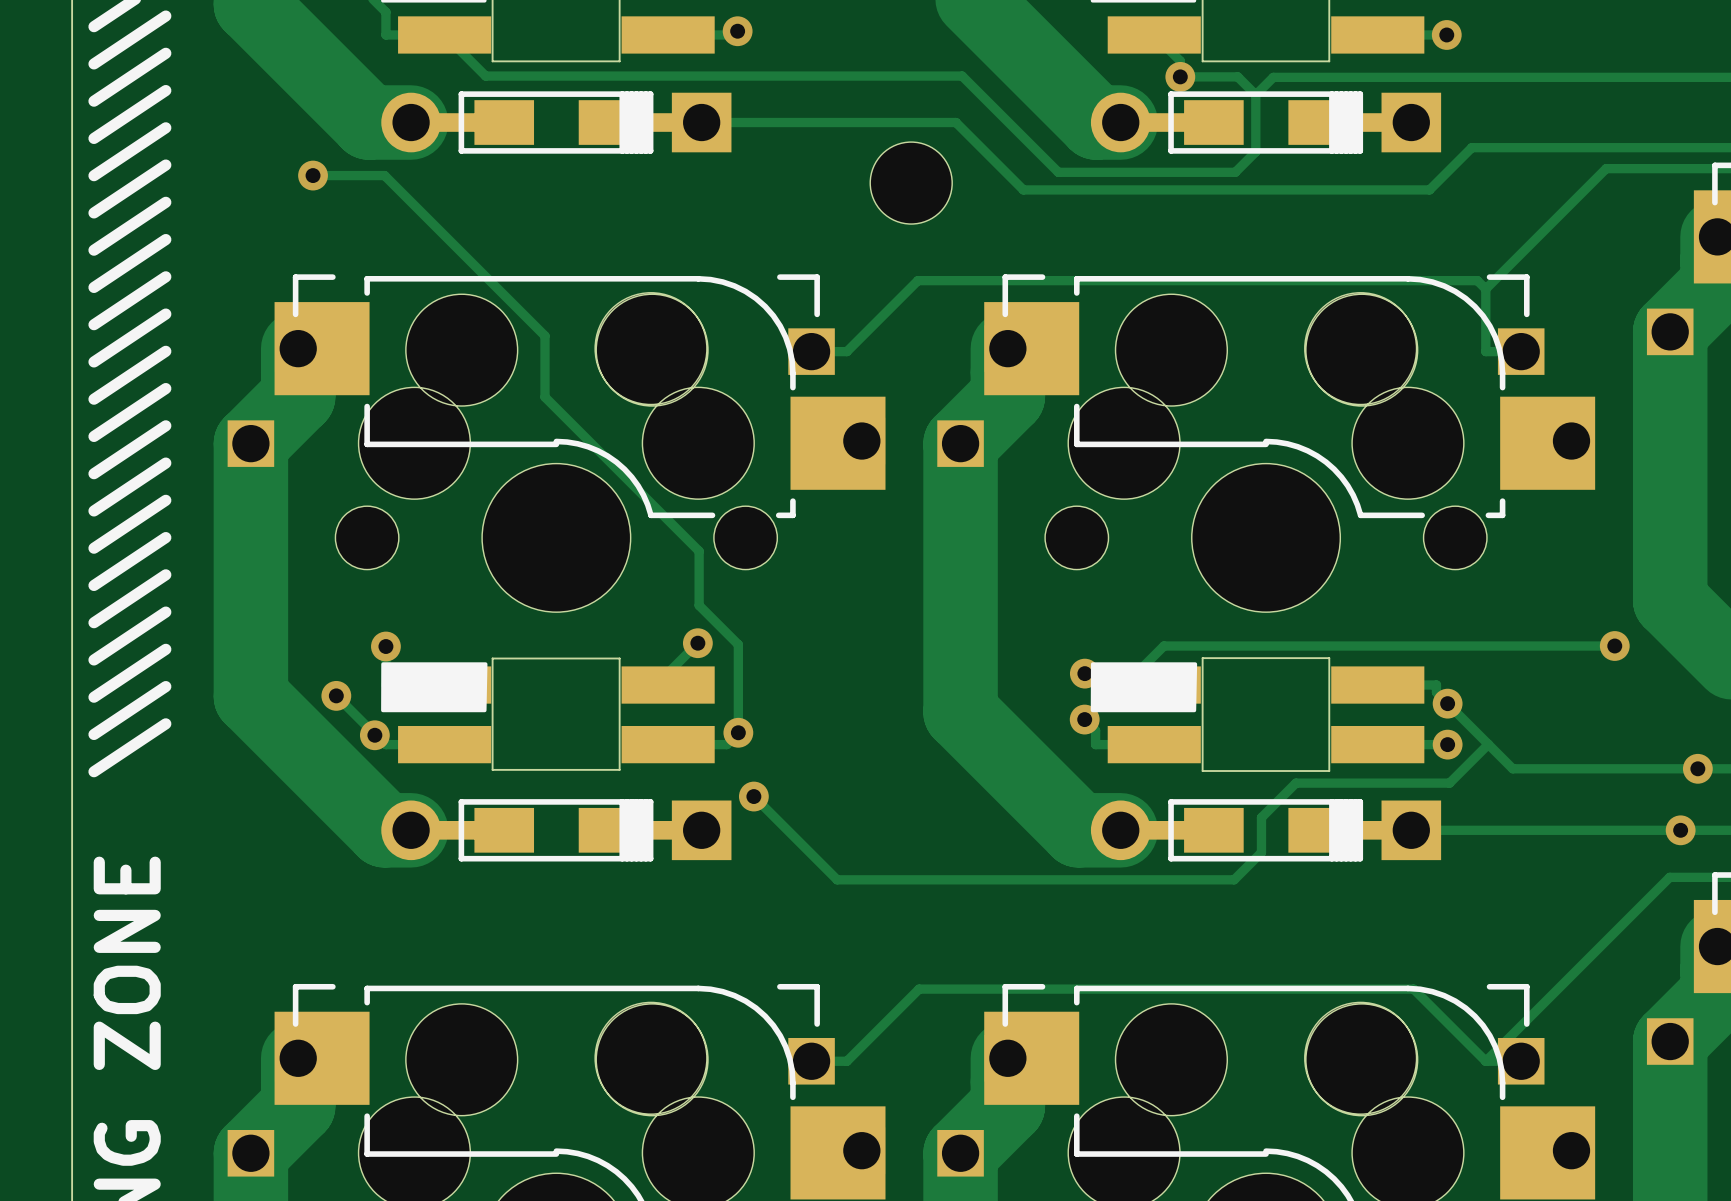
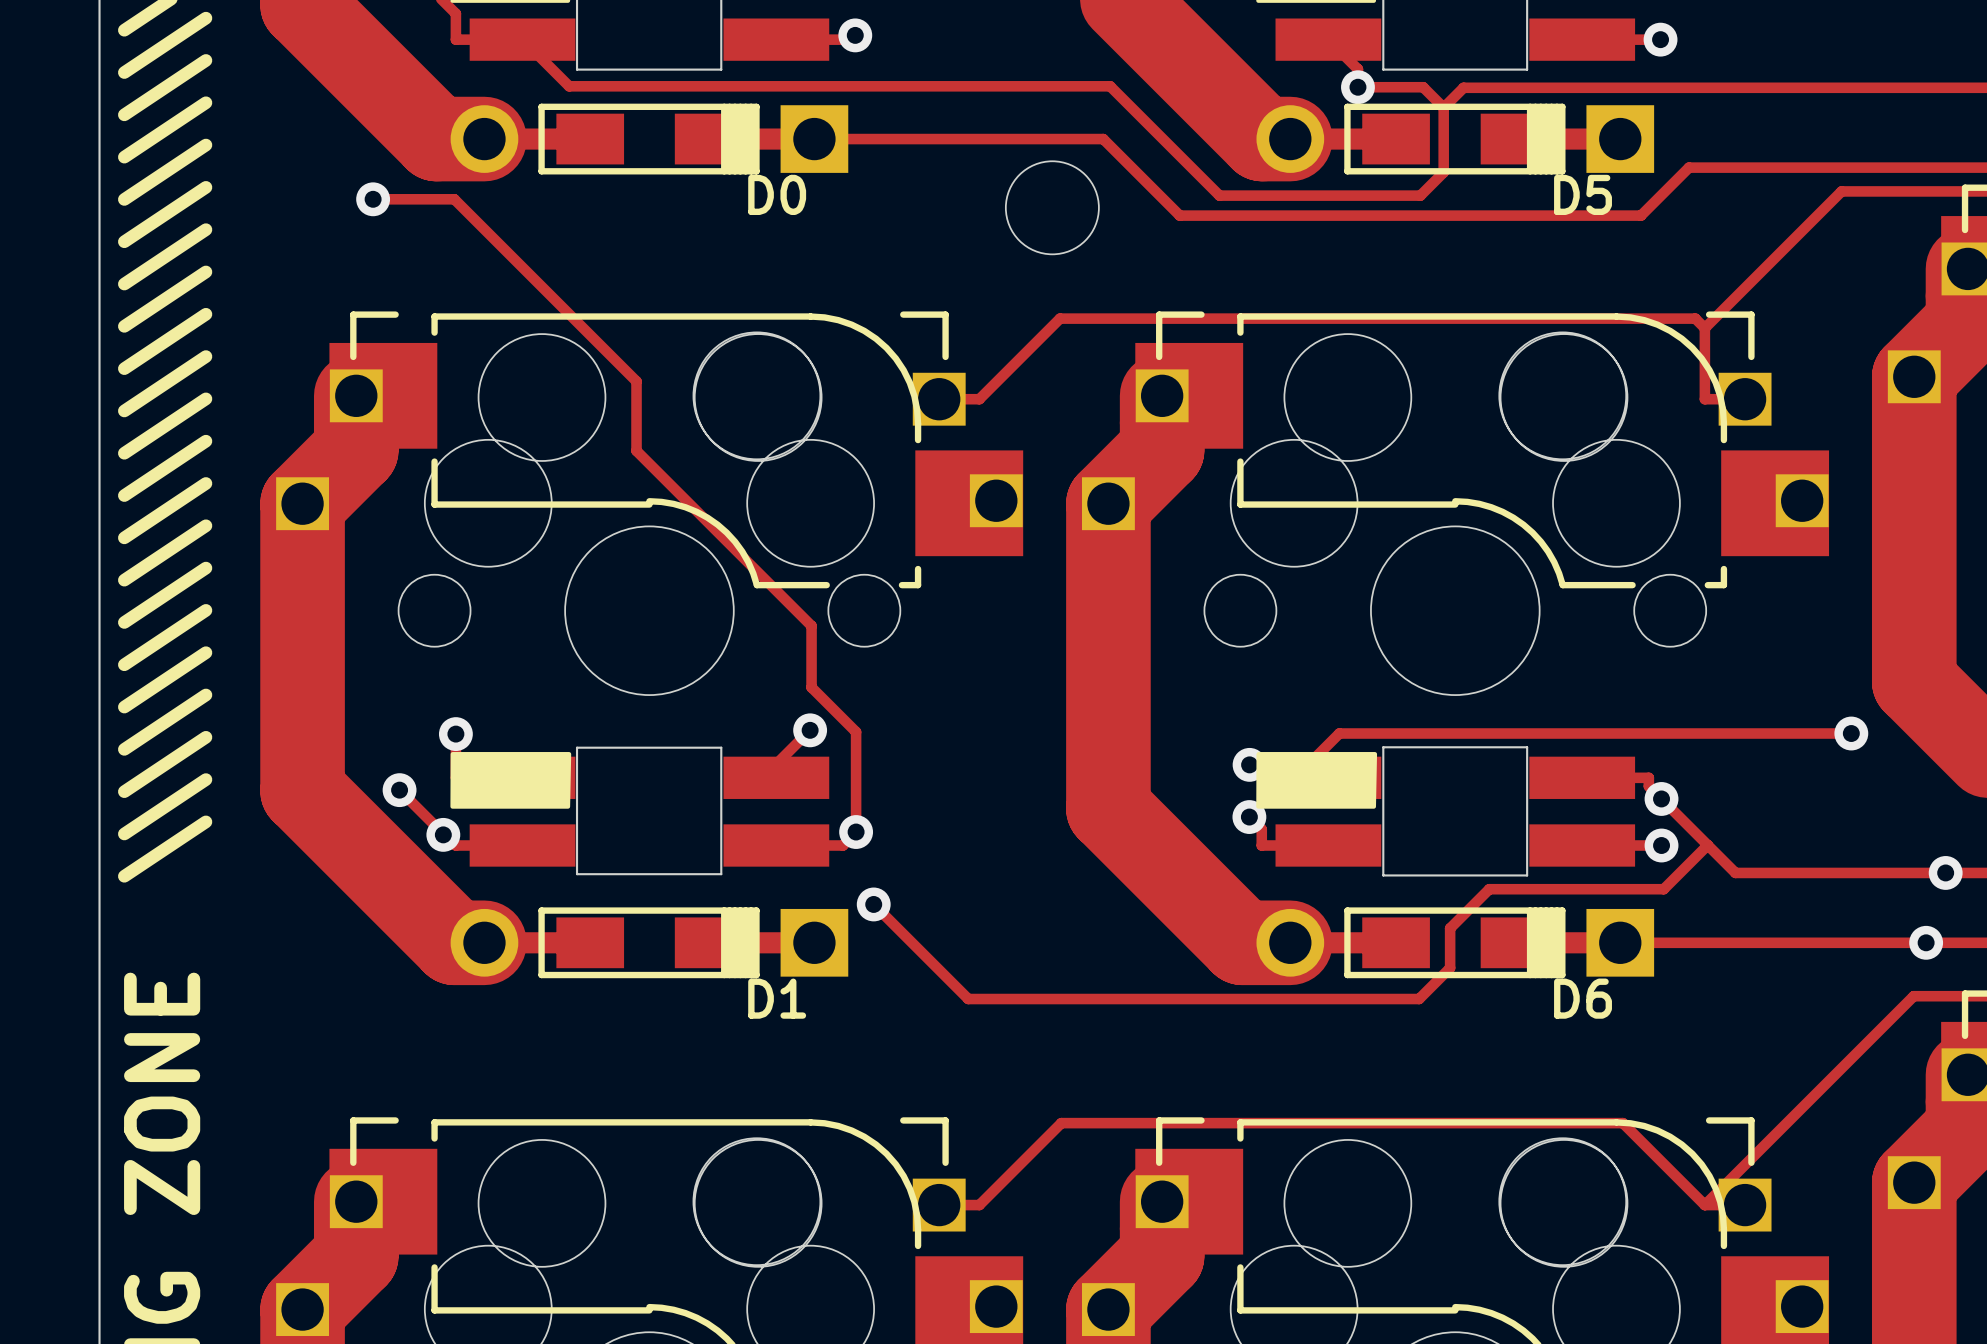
D0 name: none -> D0 (777, 194)
D5 name: none -> D5 (1583, 194)
D1 name: none -> D1 (777, 998)
D6 name: none -> D6 (1583, 998)

